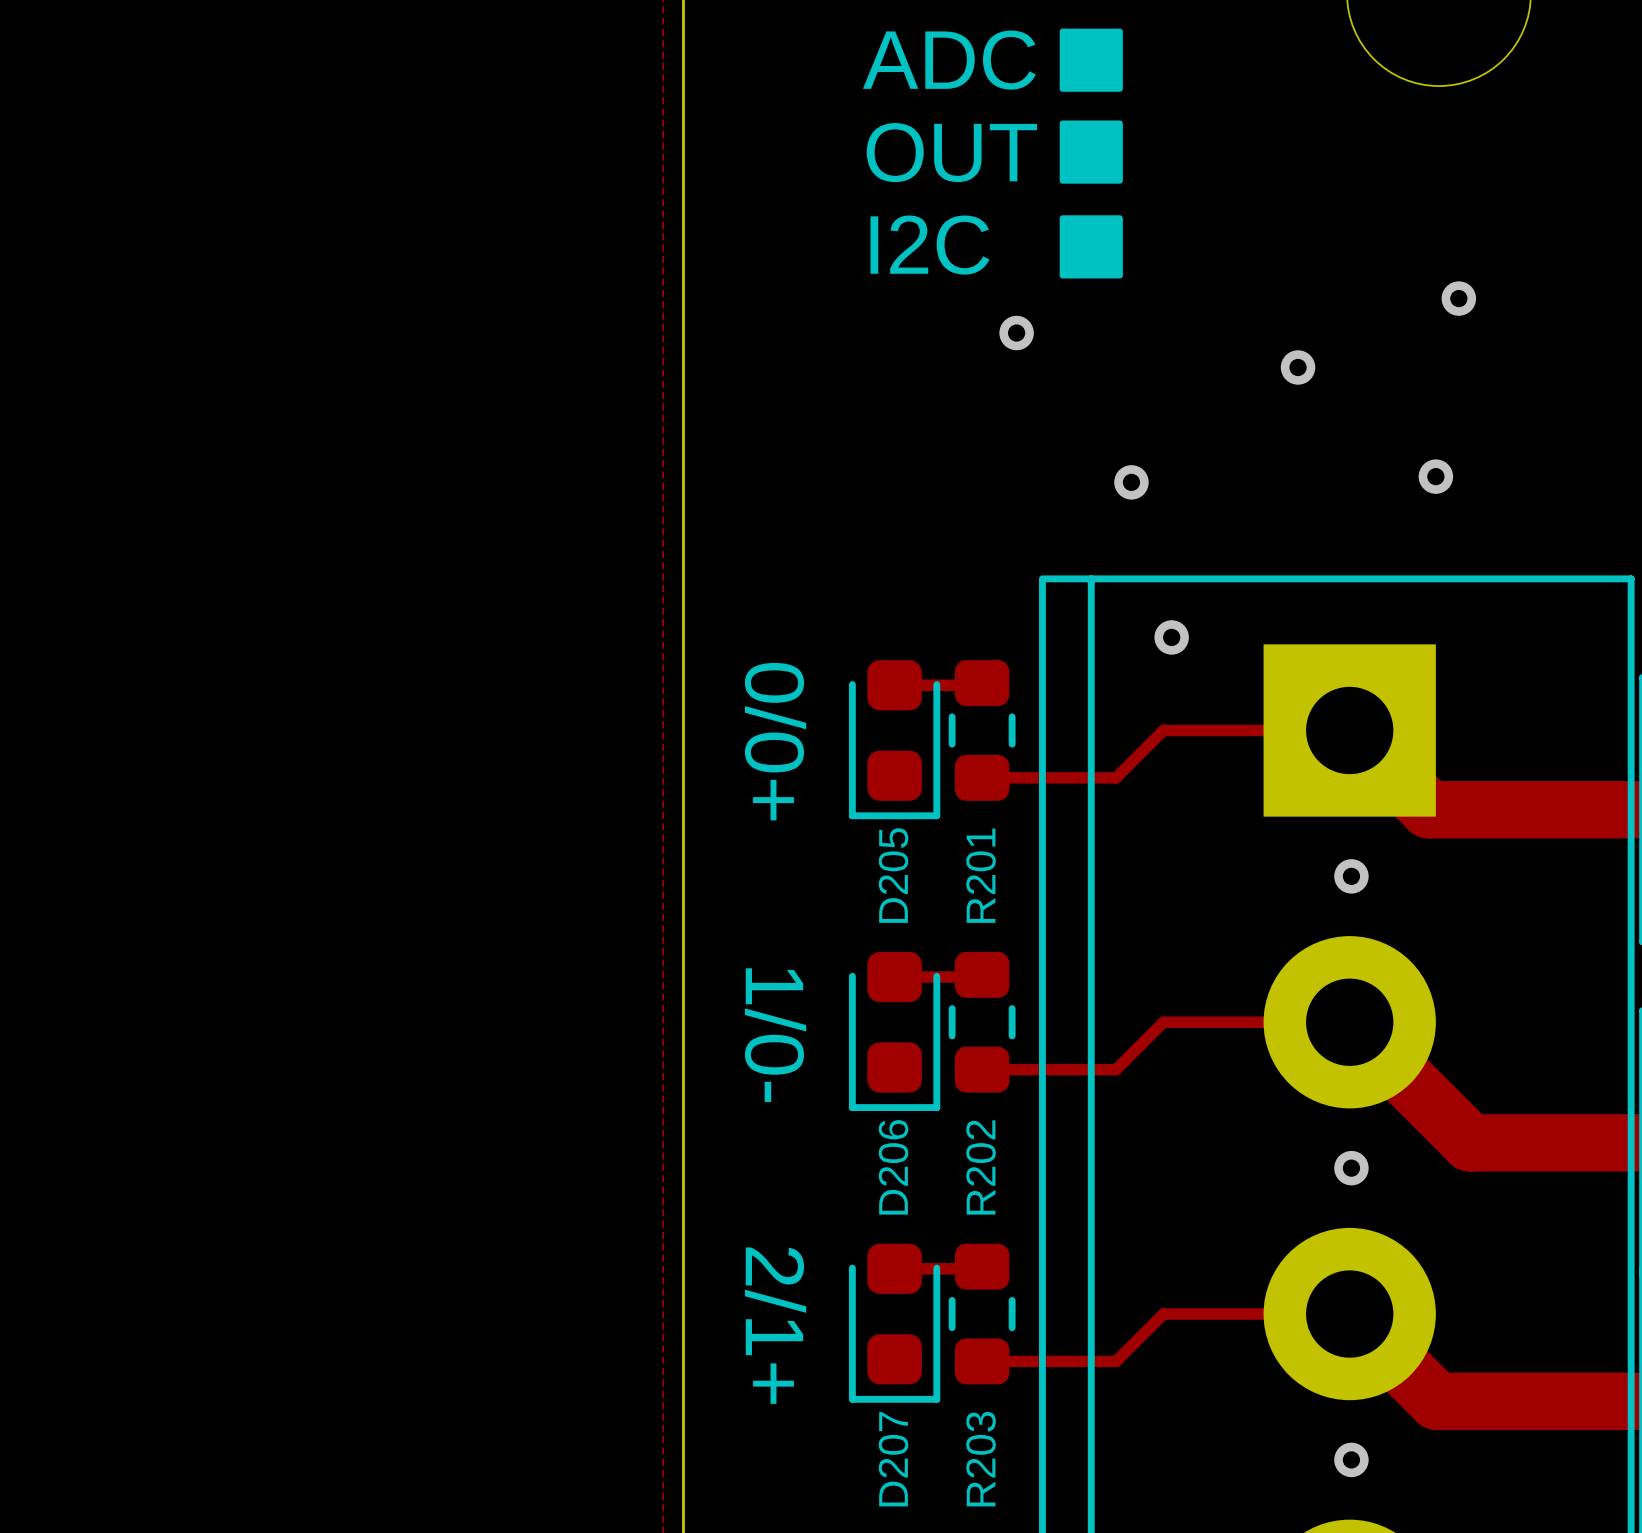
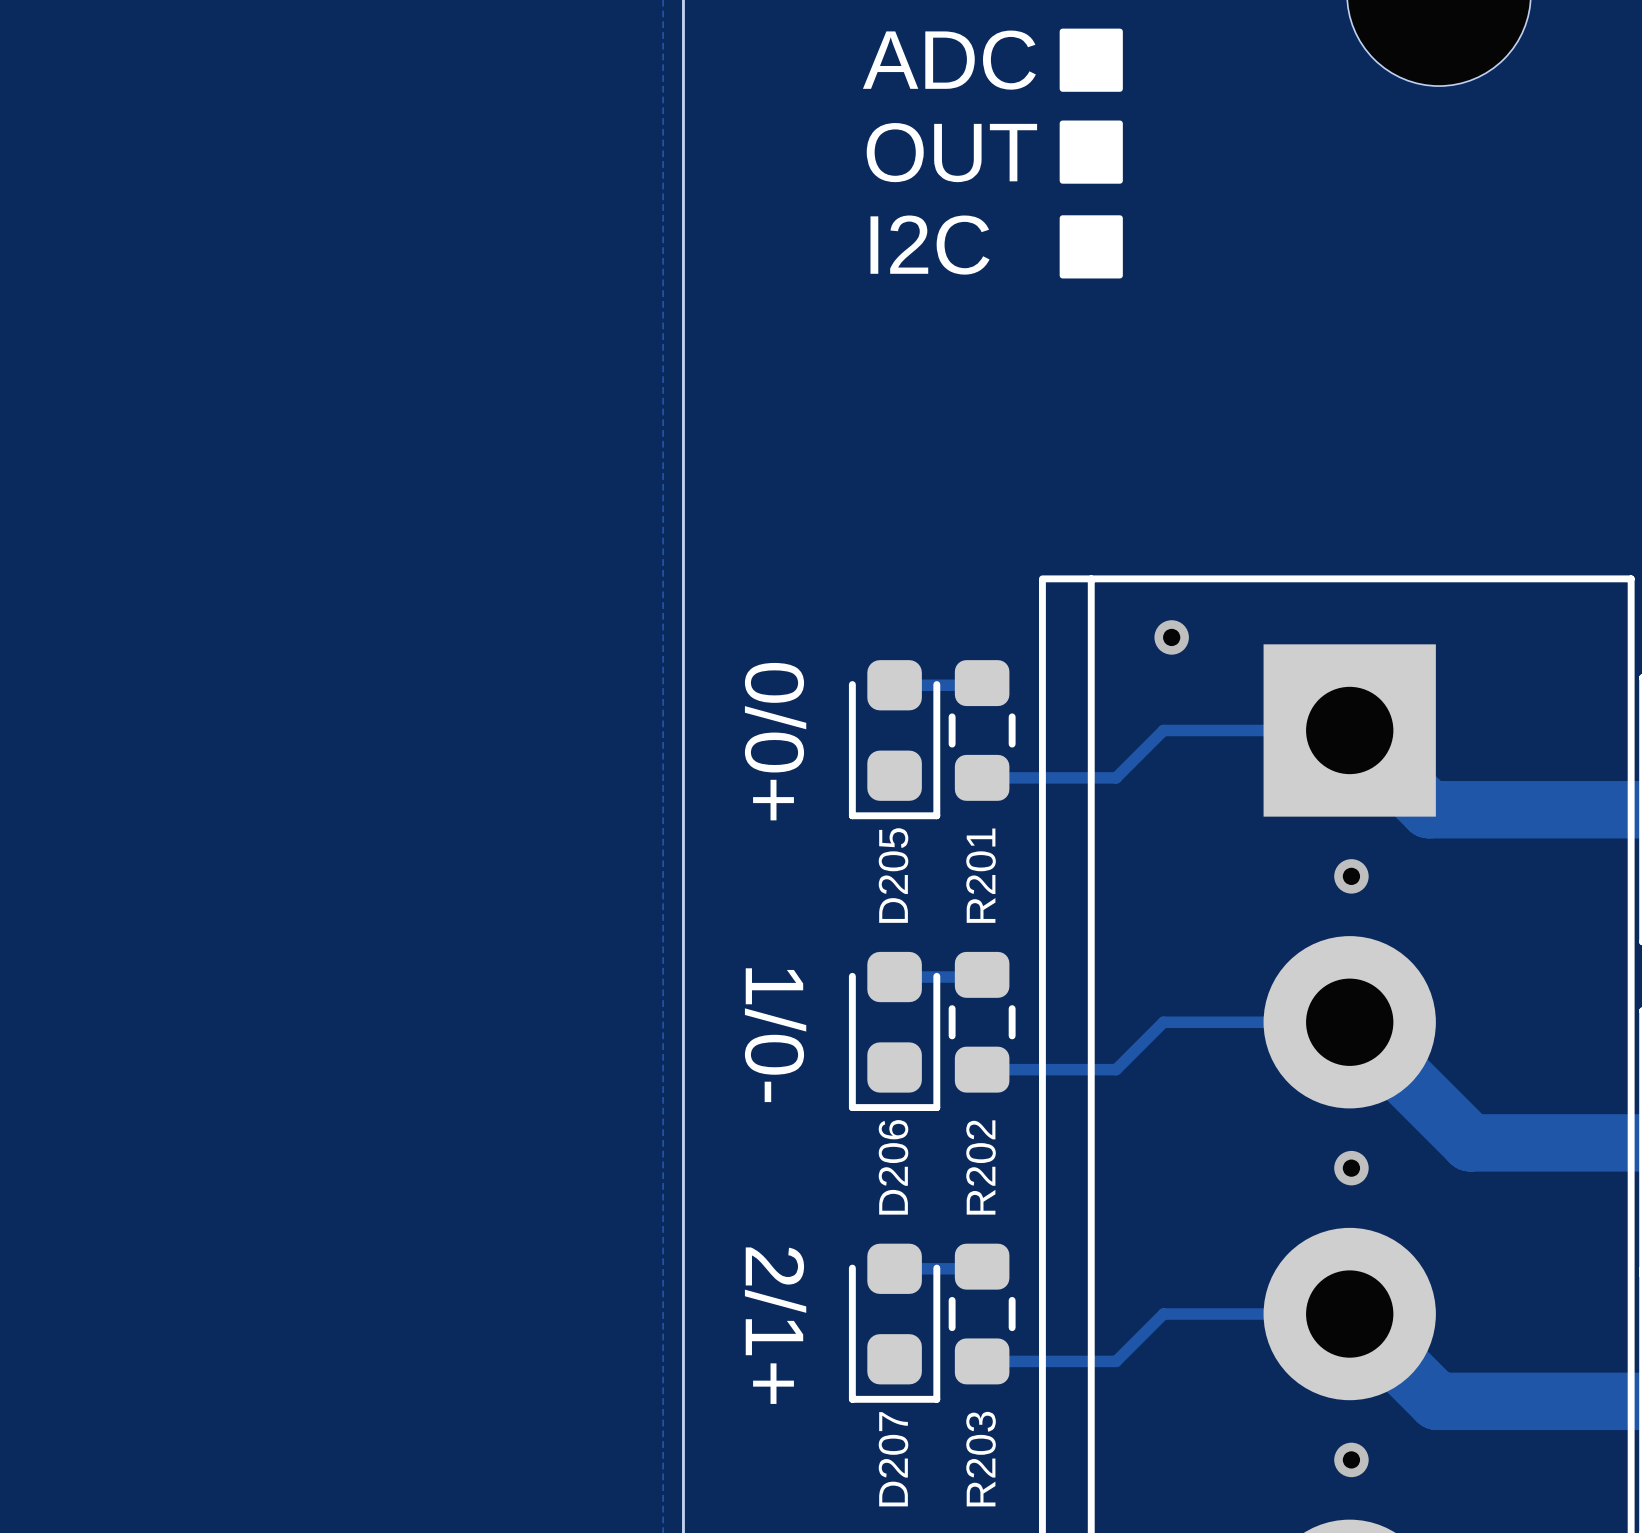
via: (1458, 298) -> none
via: (1016, 333) -> none
via: (1298, 367) -> none
via: (1435, 476) -> none
via: (1131, 482) -> none

